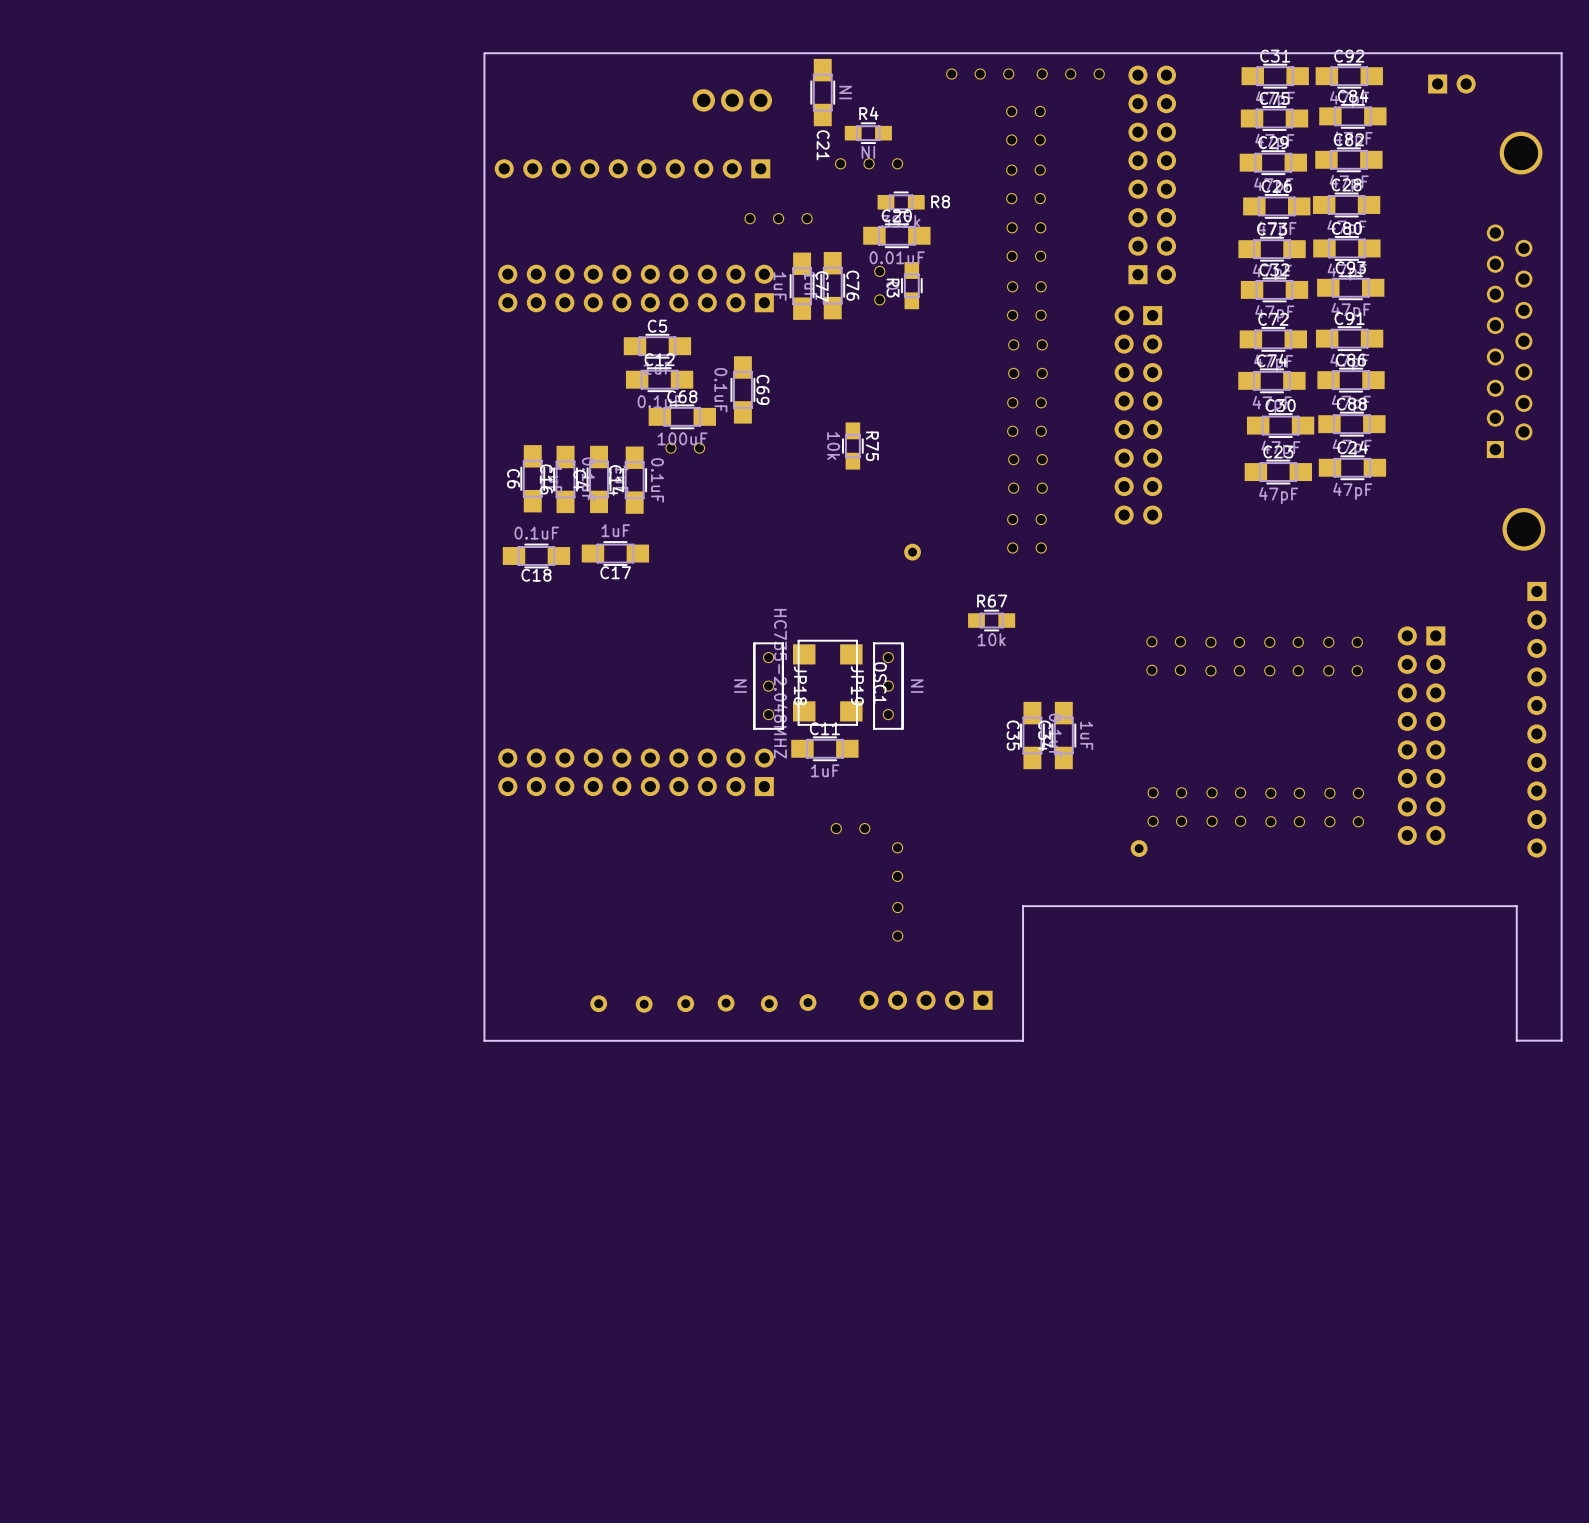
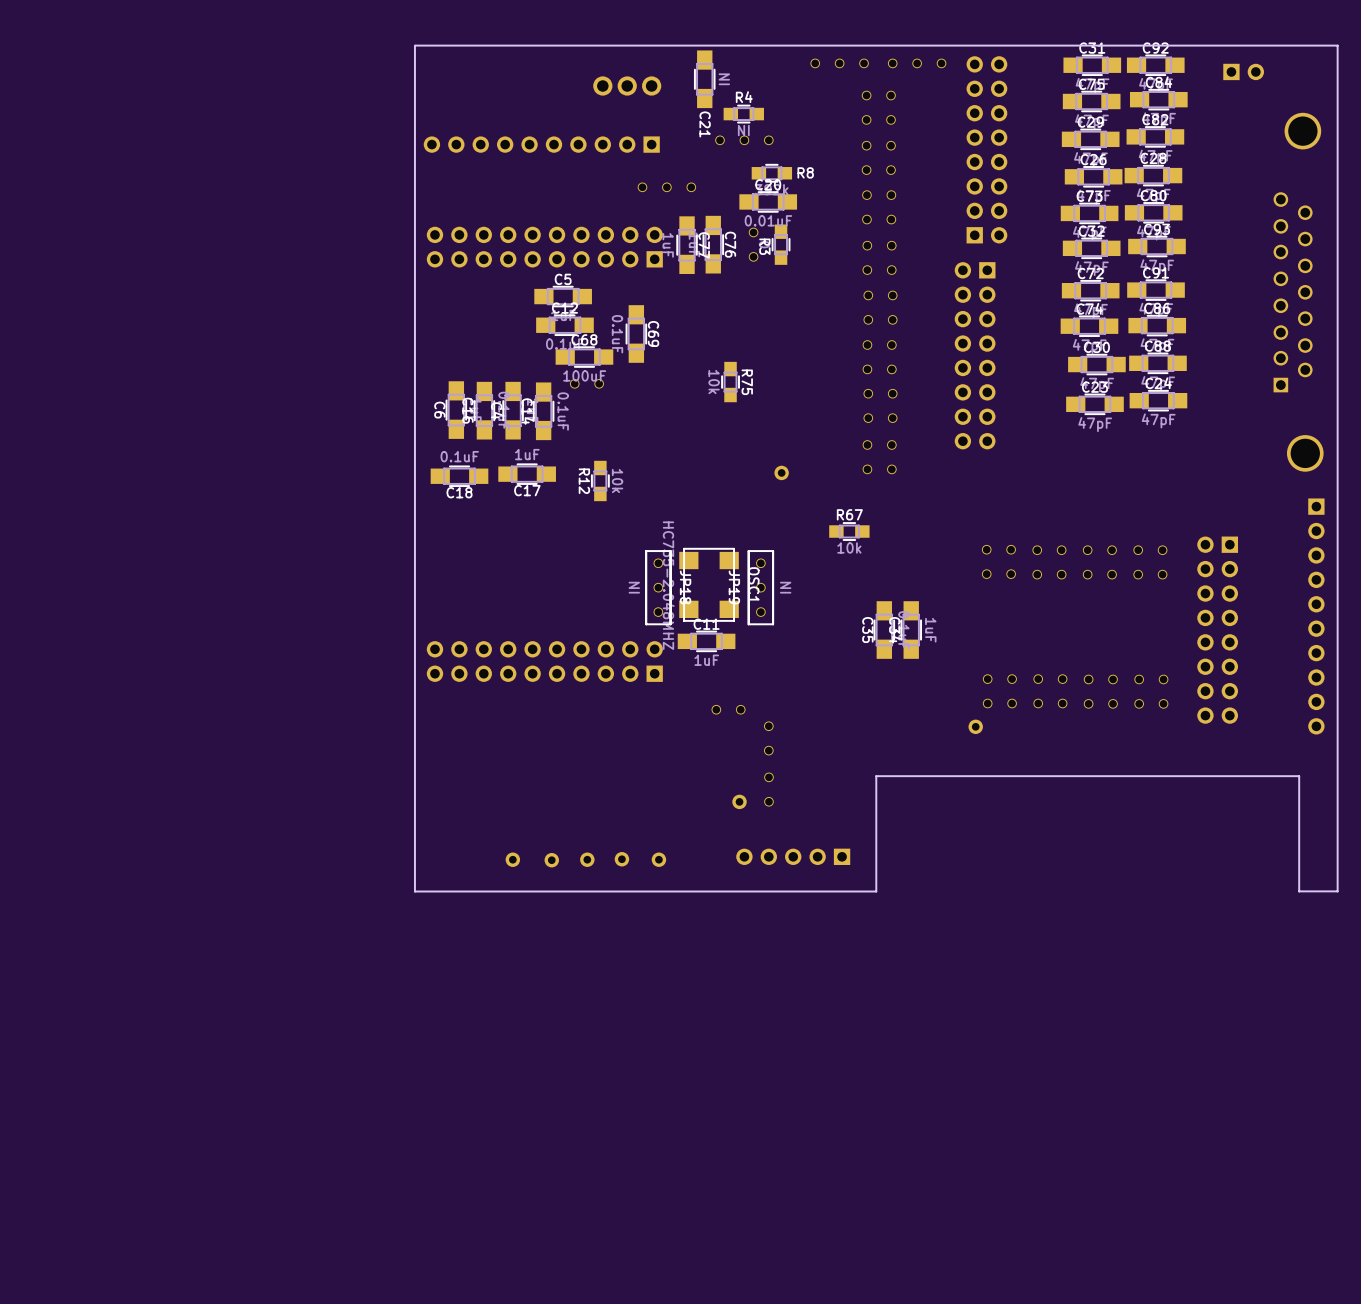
R12: none -> 10k (600, 480)
part position: (807, 1002) -> (739, 801)

